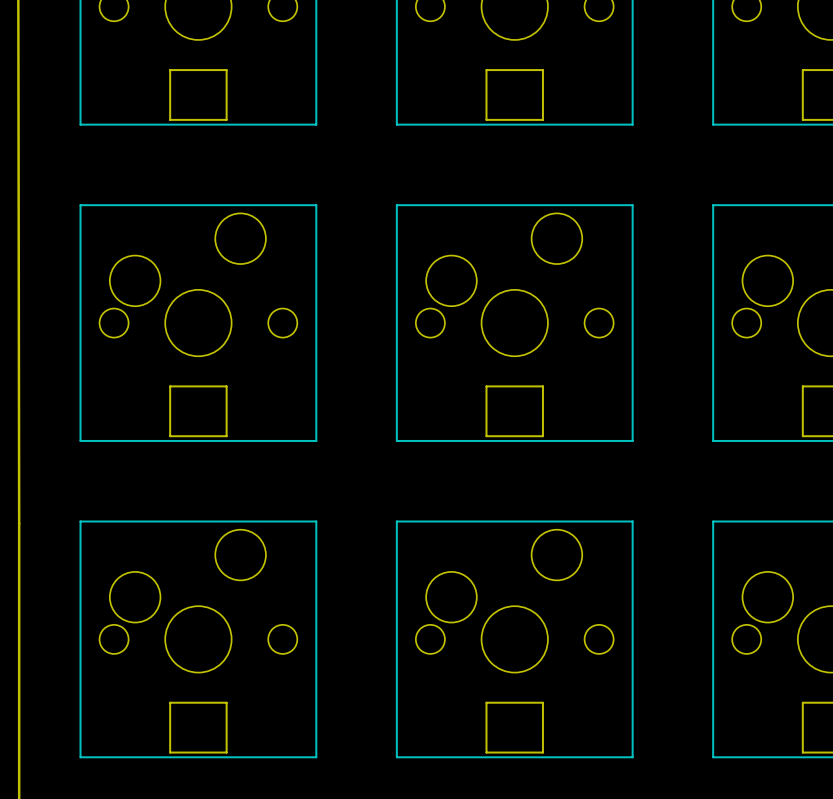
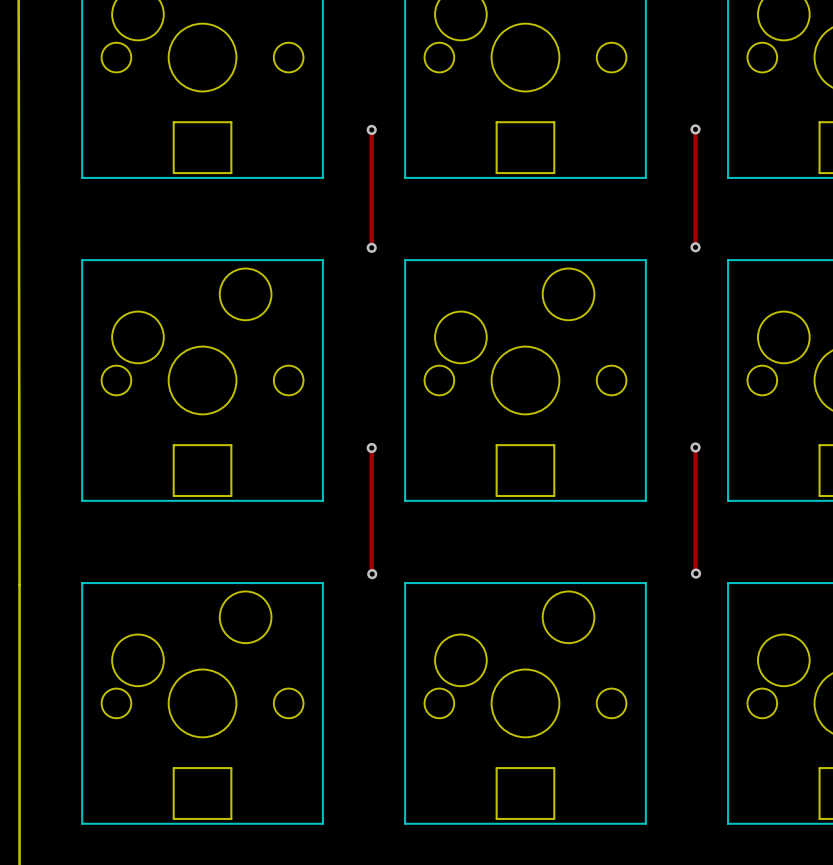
track: none -> (371, 129) (371, 247)
via: none -> (371, 129)
track: none -> (695, 129) (695, 247)
via: none -> (695, 129)
via: none -> (695, 247)
via: none -> (371, 247)
track: none -> (695, 447) (695, 573)
via: none -> (695, 447)
track: none -> (371, 448) (372, 574)
via: none -> (371, 448)
via: none -> (372, 574)
via: none -> (696, 573)

